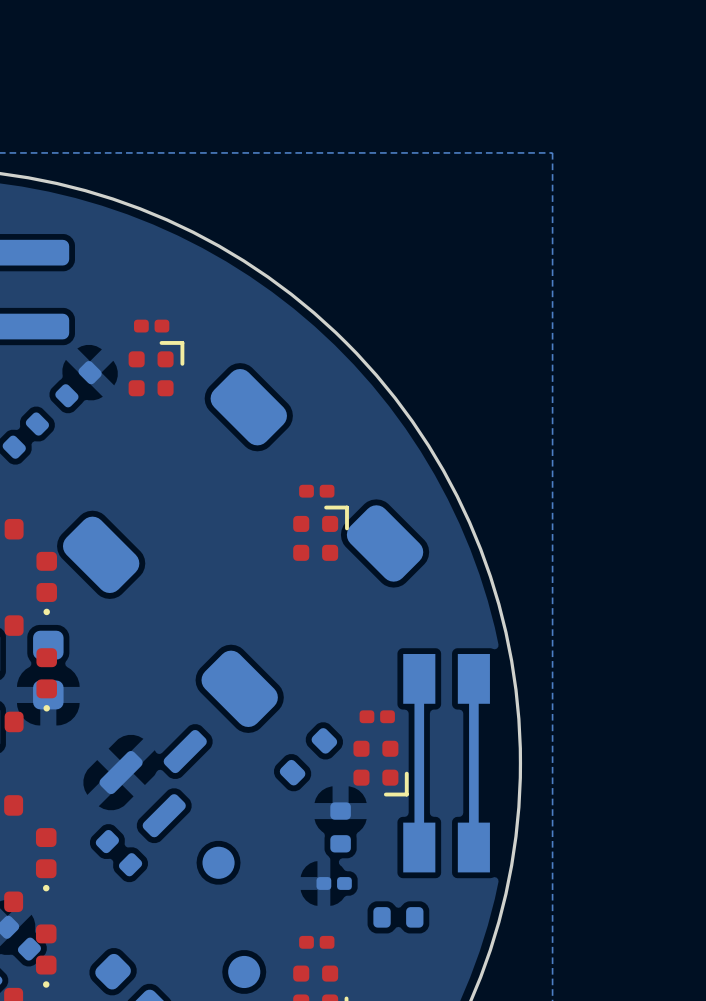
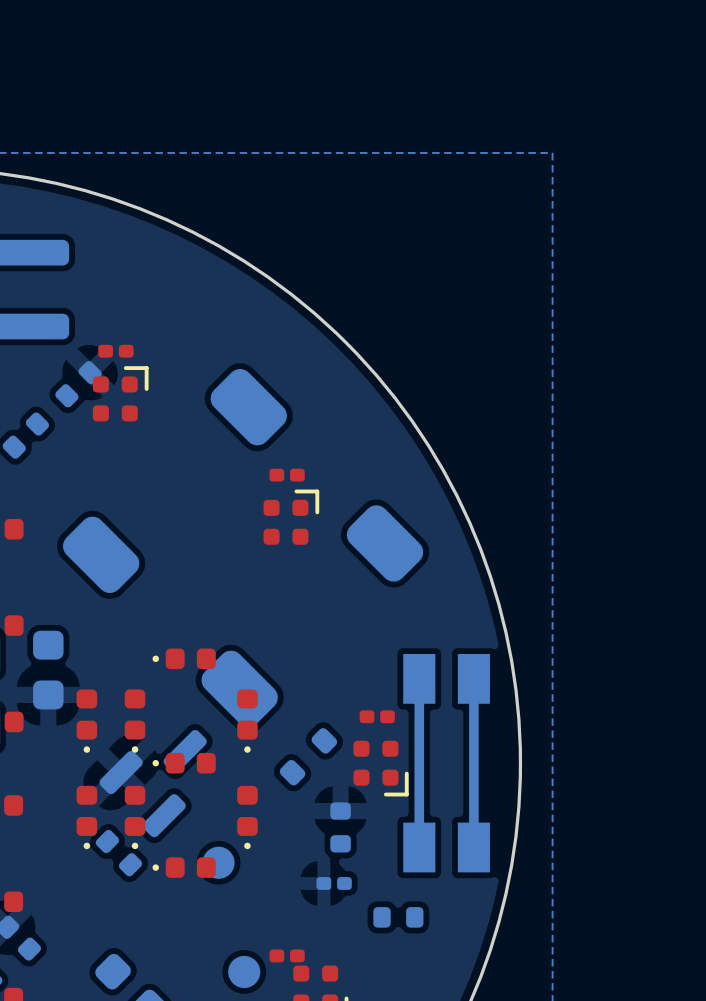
part position: (151, 326) -> (115, 351)
part position: (156, 368) -> (120, 393)
part position: (316, 491) -> (287, 475)
part position: (321, 533) -> (291, 517)
part: (46, 583) -> none
part: none -> (184, 658)
part: (46, 679) -> none
part: none -> (86, 721)
part: none -> (135, 721)
part: none -> (247, 721)
part: none -> (184, 763)
part: none -> (86, 817)
part: none -> (135, 817)
part: none -> (247, 817)
part: (46, 859) -> none
part: none -> (184, 867)
part position: (316, 942) -> (287, 955)
part: (46, 956) -> none

